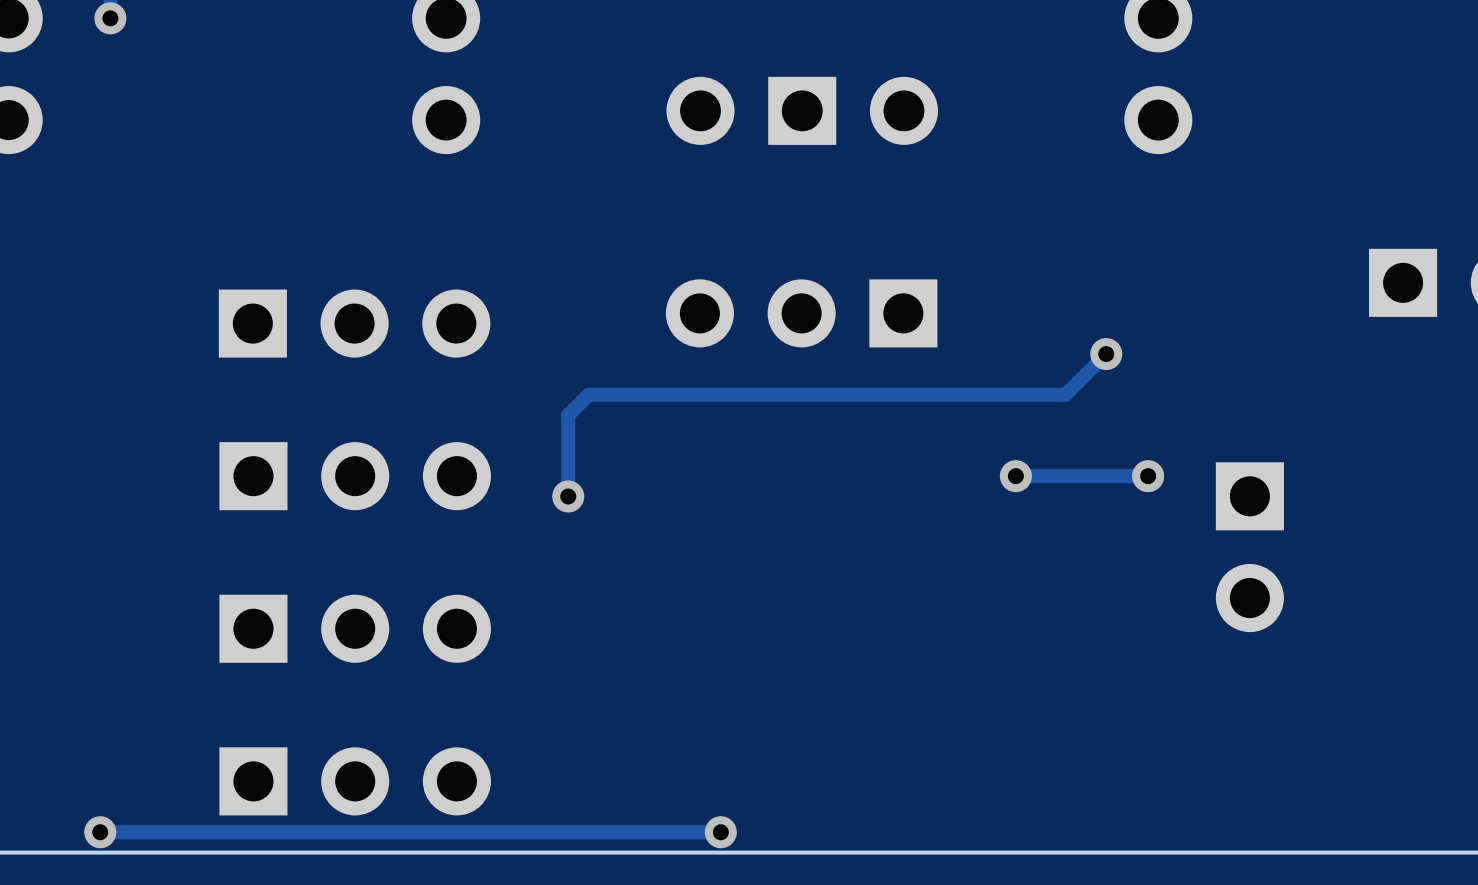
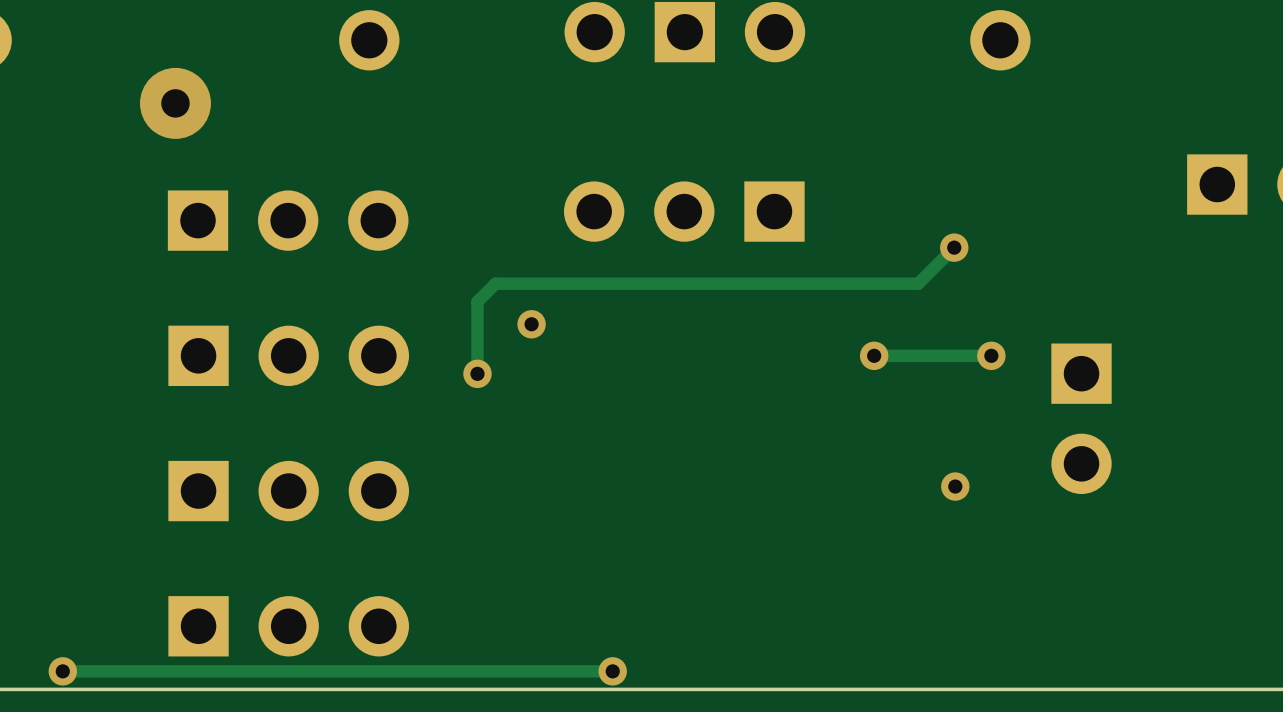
via: none -> (175, 103)
via: none -> (531, 324)
via: none -> (955, 486)

